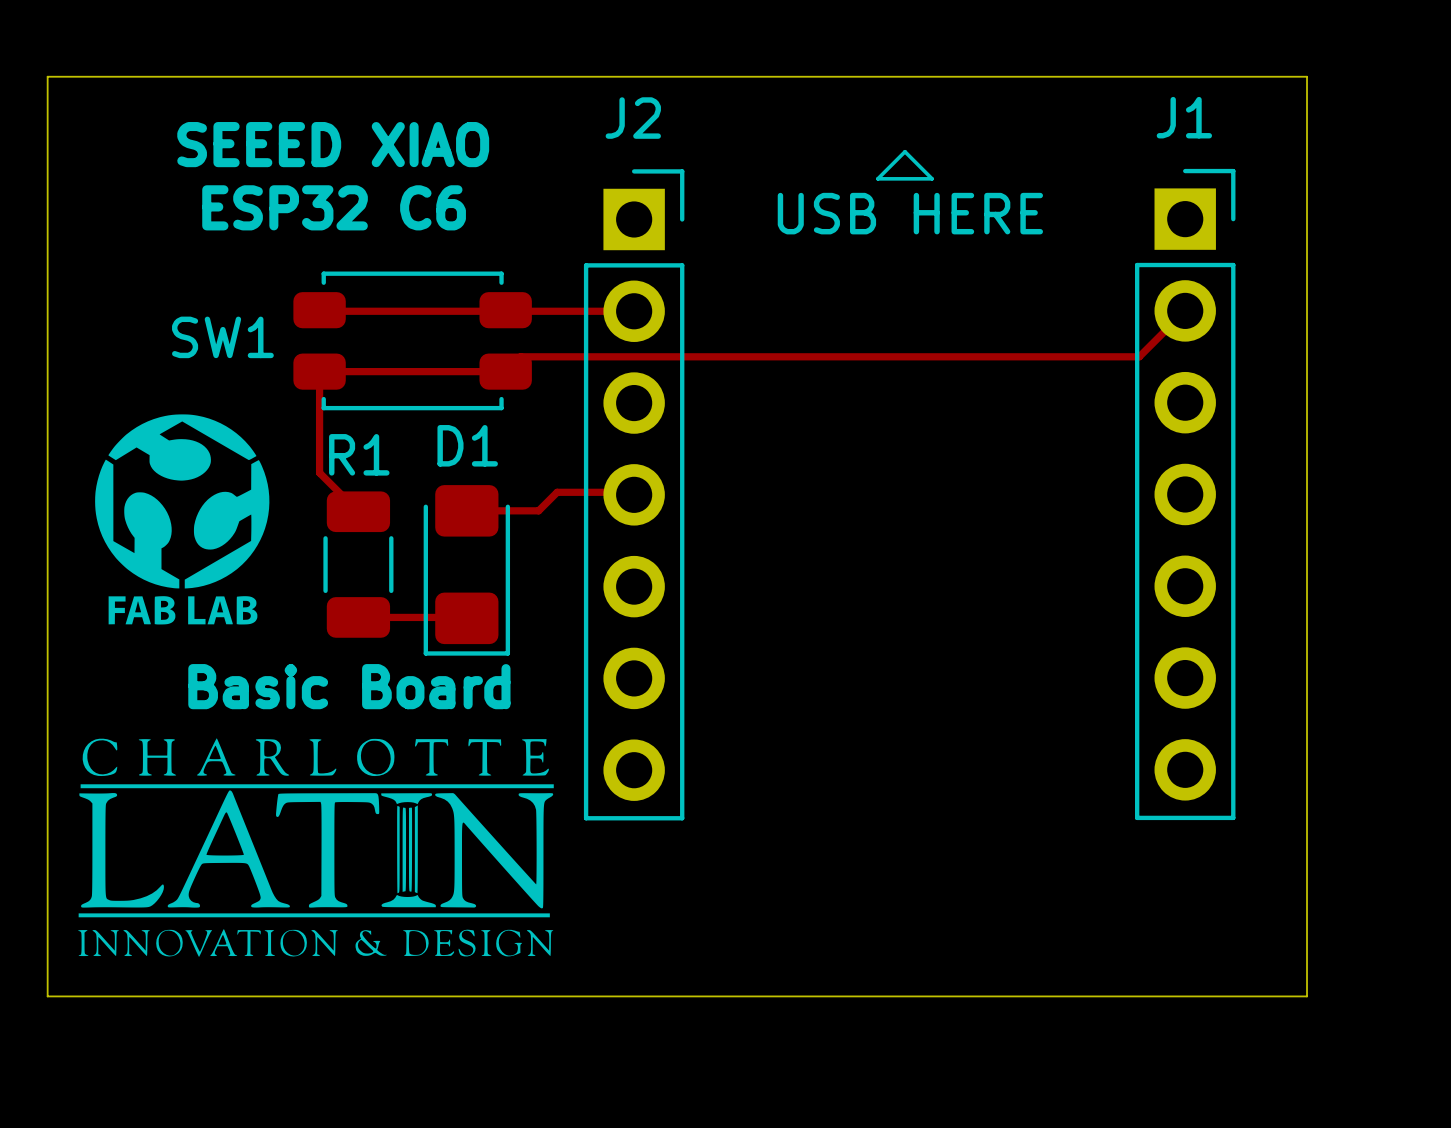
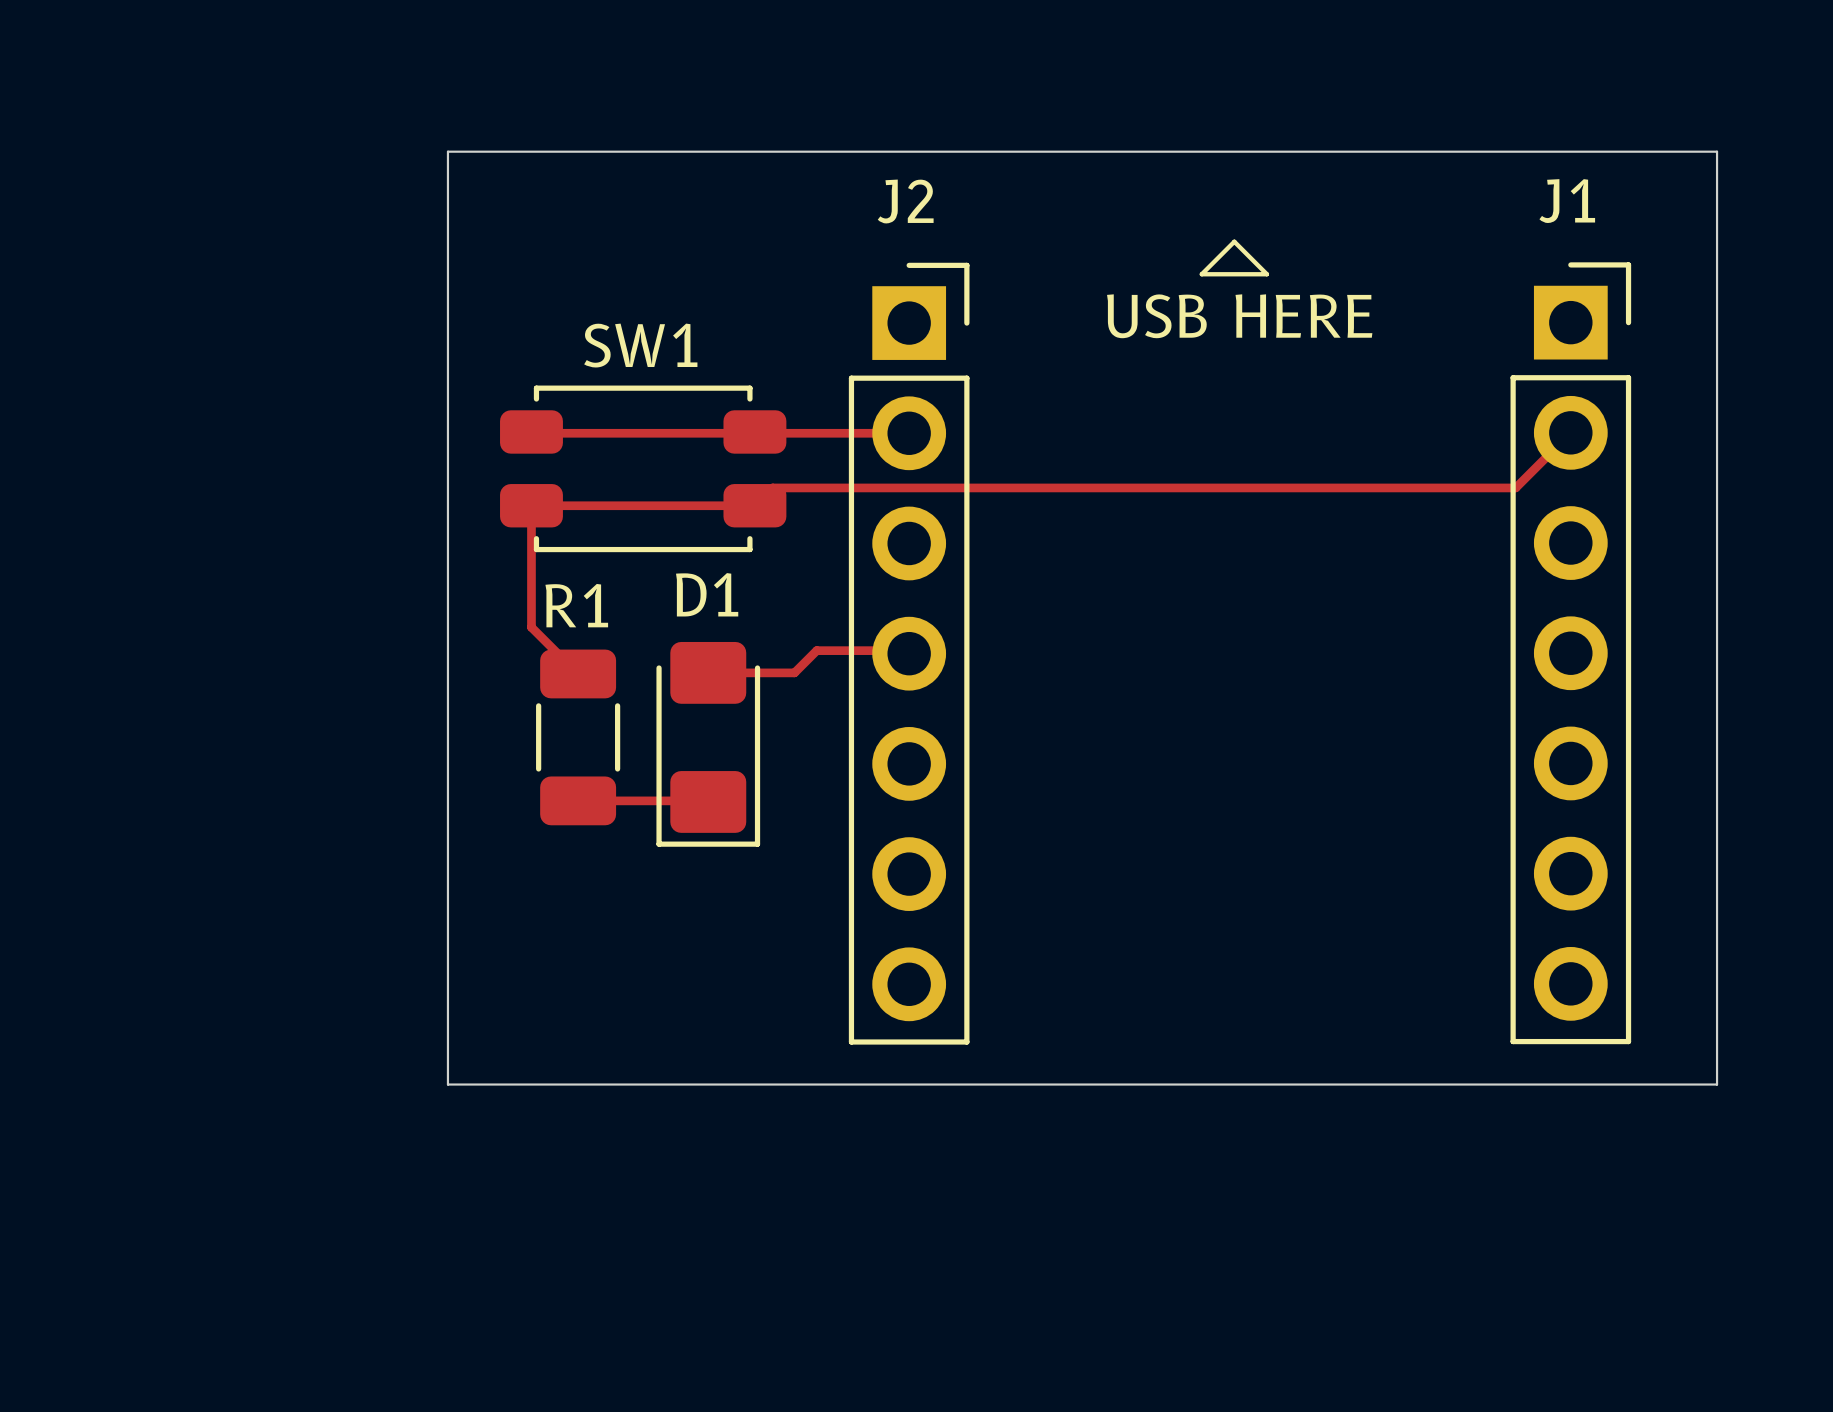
board edge: (250, 76) (47, 76) (47, 996) (1307, 996) (1307, 853) -> (447, 151) (447, 1084) (1717, 1084)
text: SEEED XIAO (333, 144) -> none
text: ESP32 C6 (334, 207) -> none
SW1 name position: SW1 (222, 337) -> SW1 (640, 345)
drawing: [95, 414, 270, 625] -> none
text: Basic Board (349, 686) -> none
drawing: [78, 738, 554, 957] -> none

